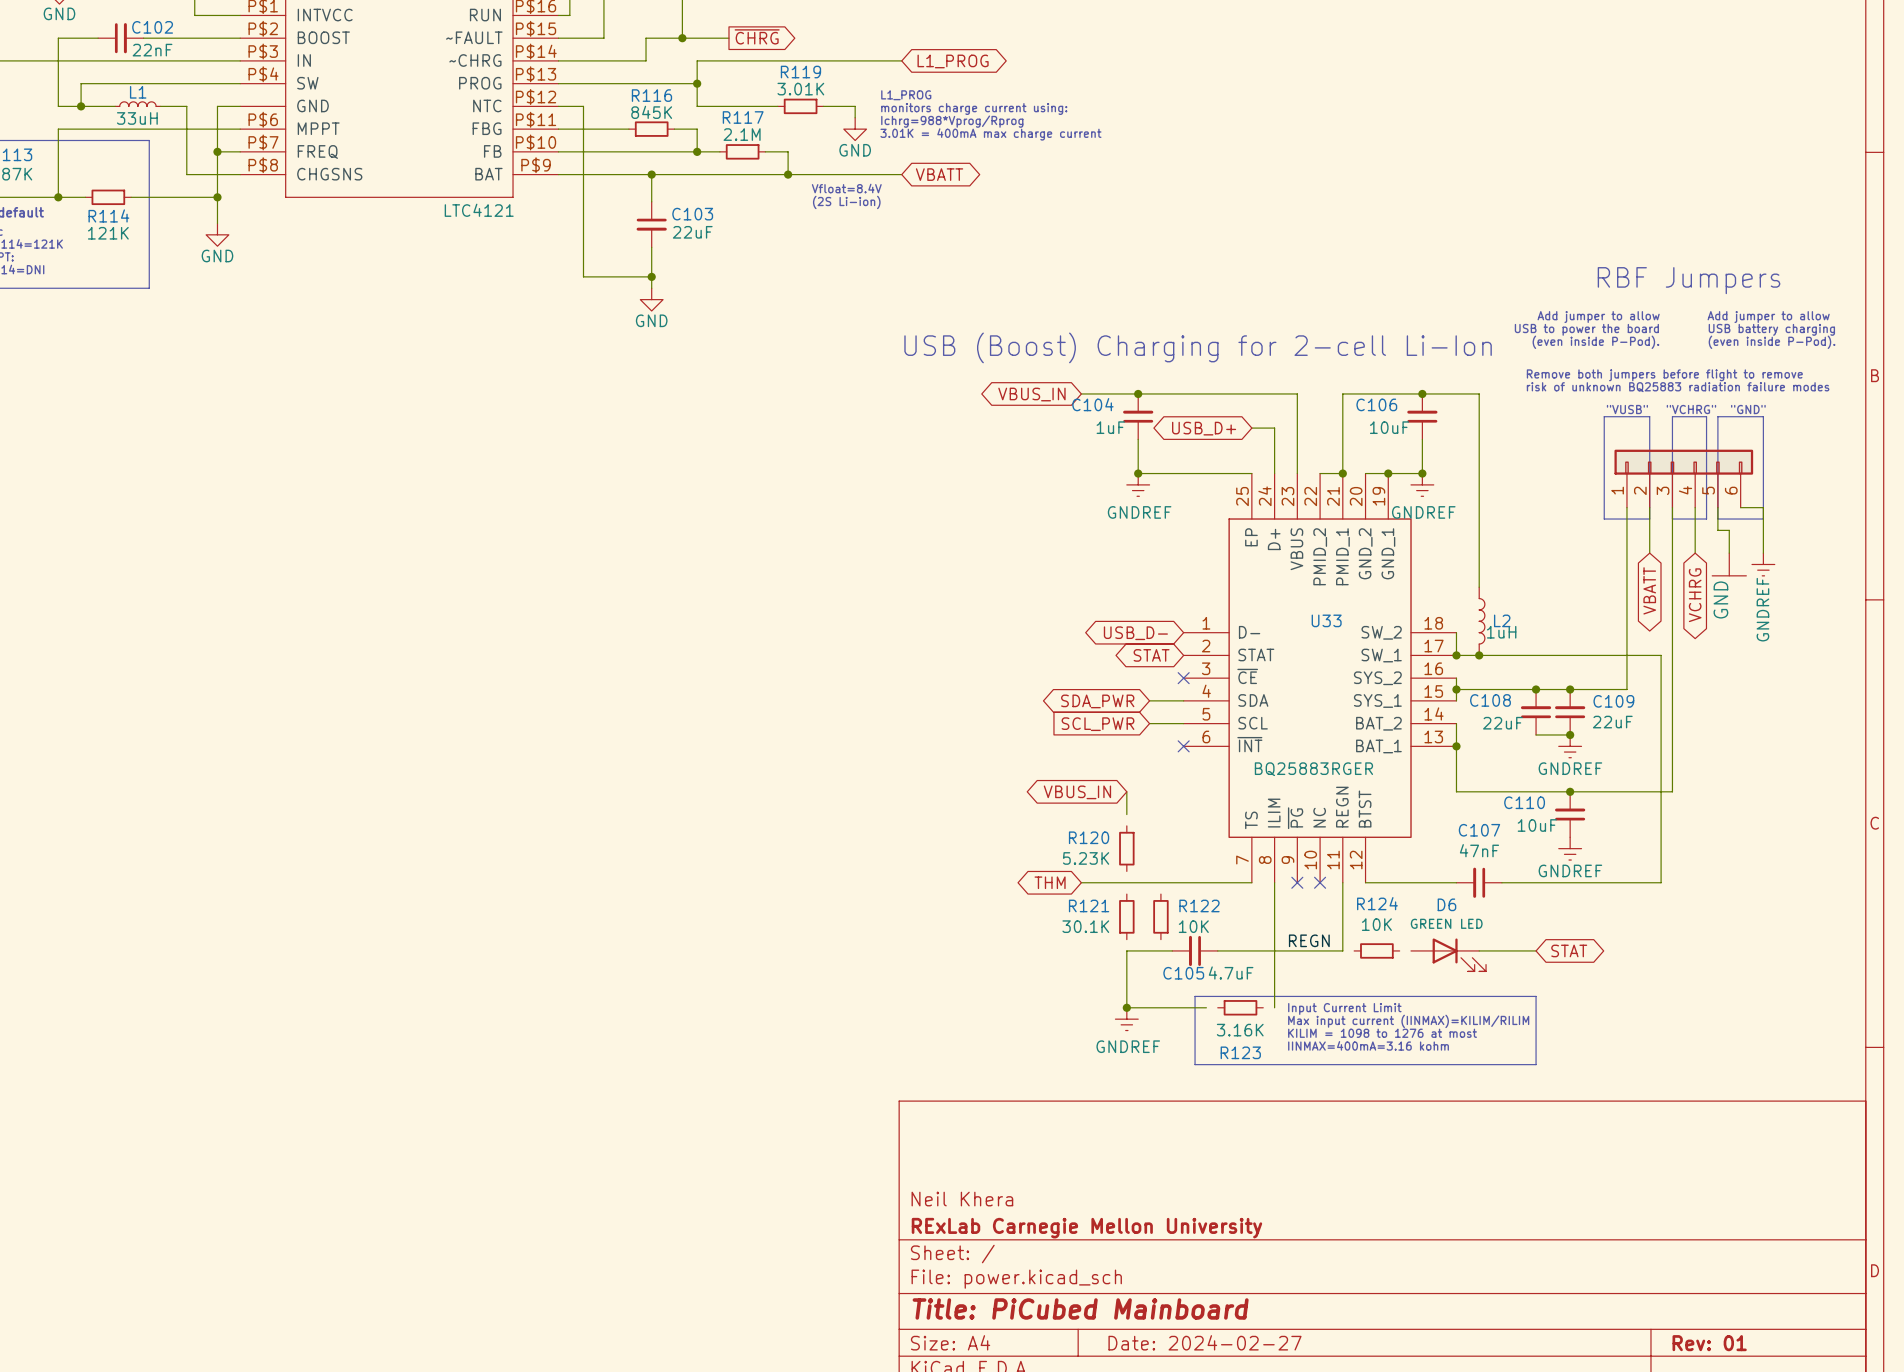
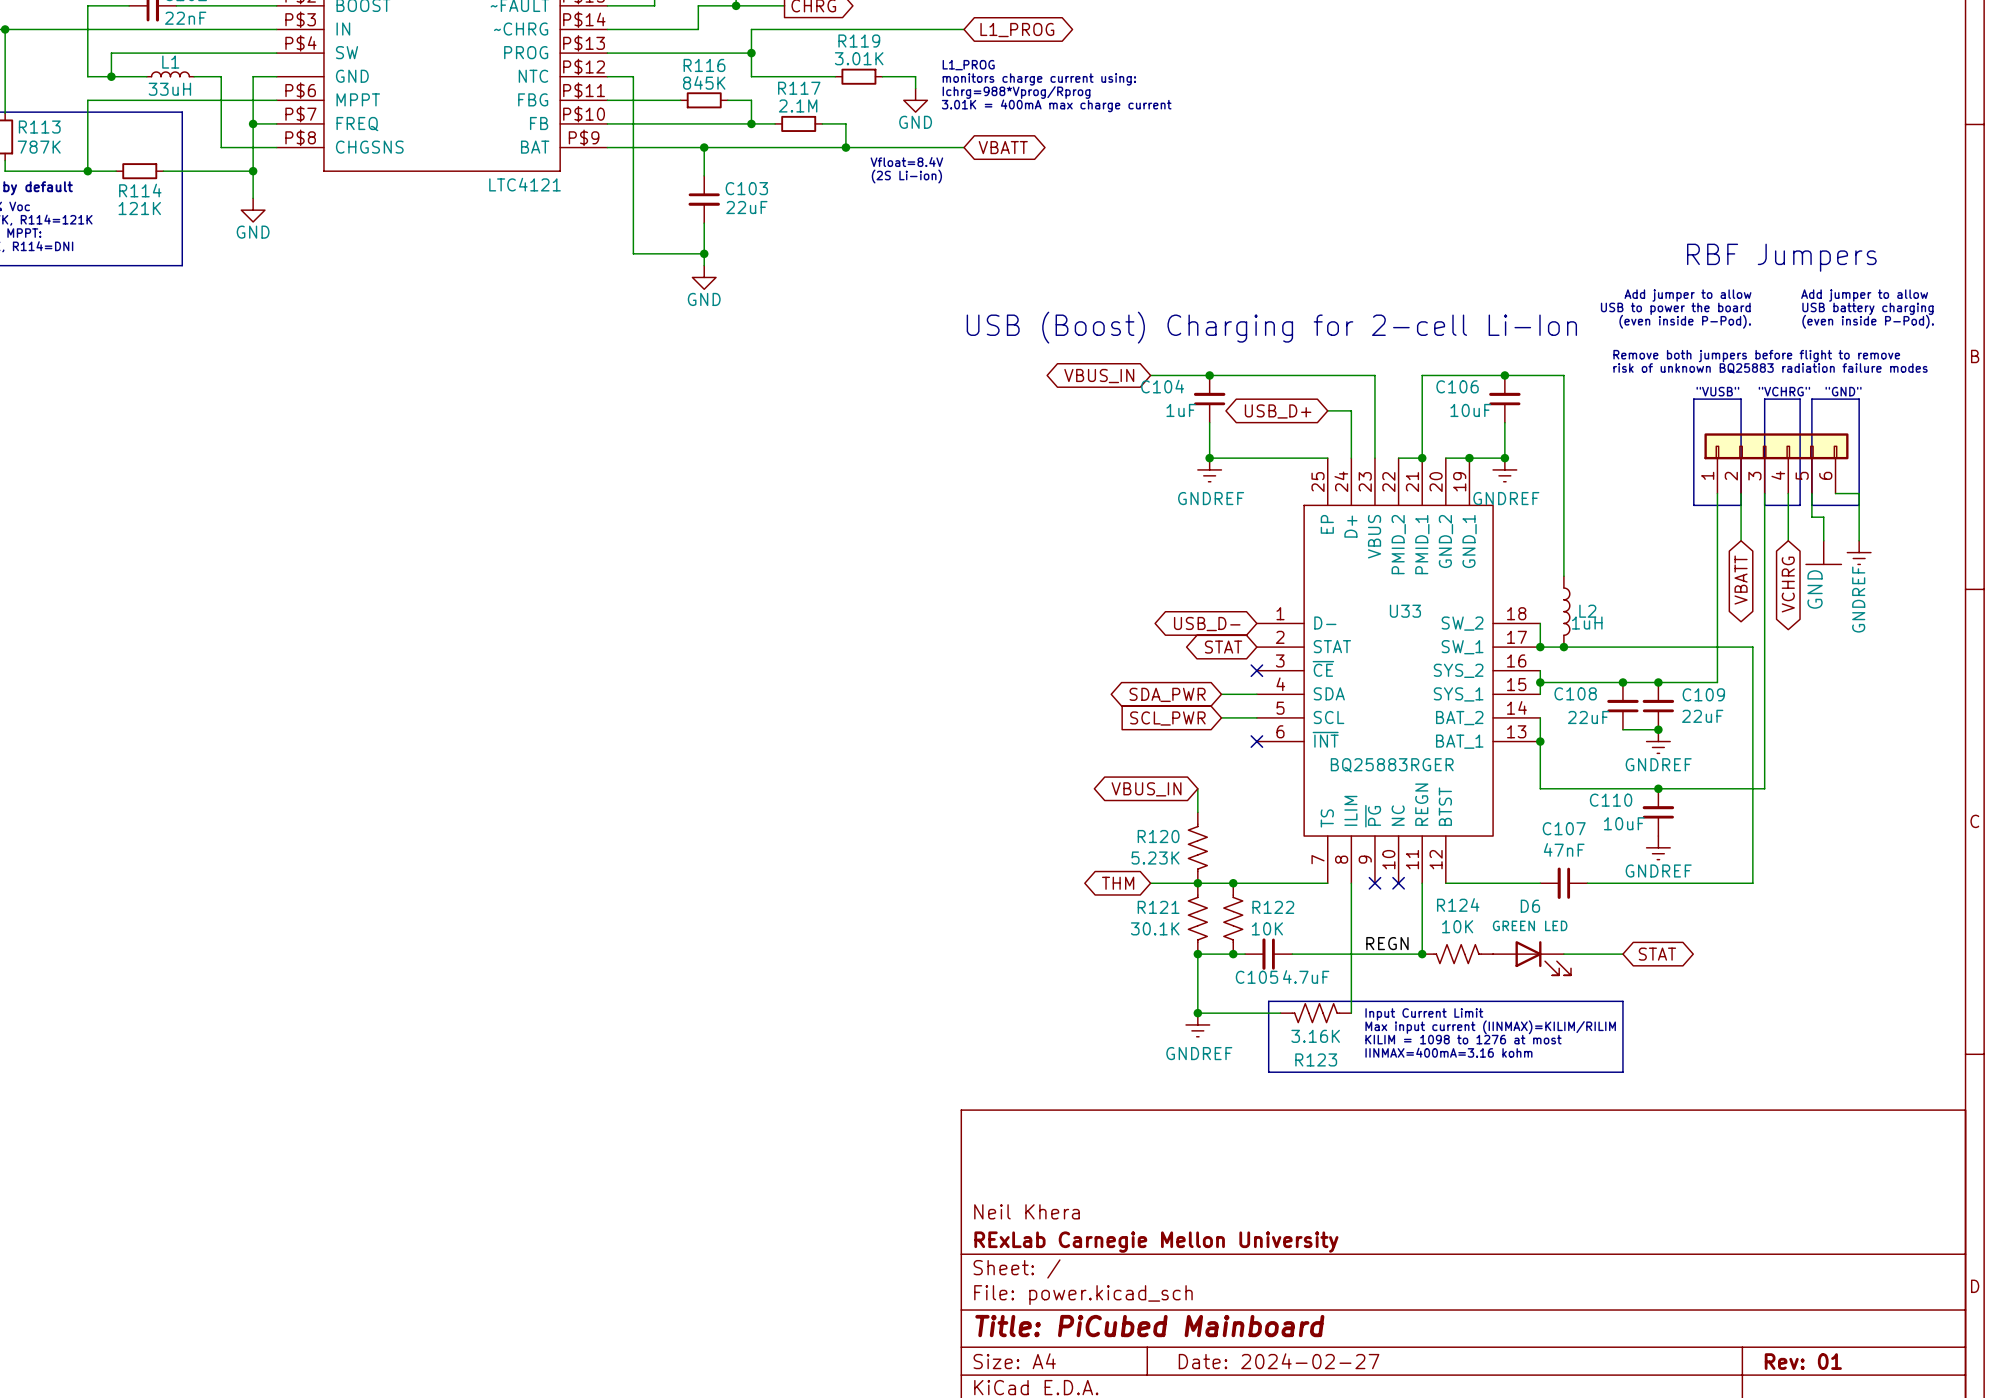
R120 symbol: [1119, 825, 1135, 872] -> [1188, 812, 1208, 884]
junction: none -> (1197, 883)
junction: none -> (1233, 883)
R121 symbol: [1119, 894, 1135, 940] -> [1188, 883, 1208, 955]
R122 symbol: [1153, 894, 1169, 940] -> [1223, 883, 1243, 955]
R124 symbol: [1354, 943, 1400, 959] -> [1422, 944, 1494, 964]
junction: none -> (1197, 954)
junction: none -> (1233, 954)
junction: none -> (1422, 954)
R123 symbol: [1217, 1000, 1264, 1016] -> [1280, 1003, 1352, 1023]

